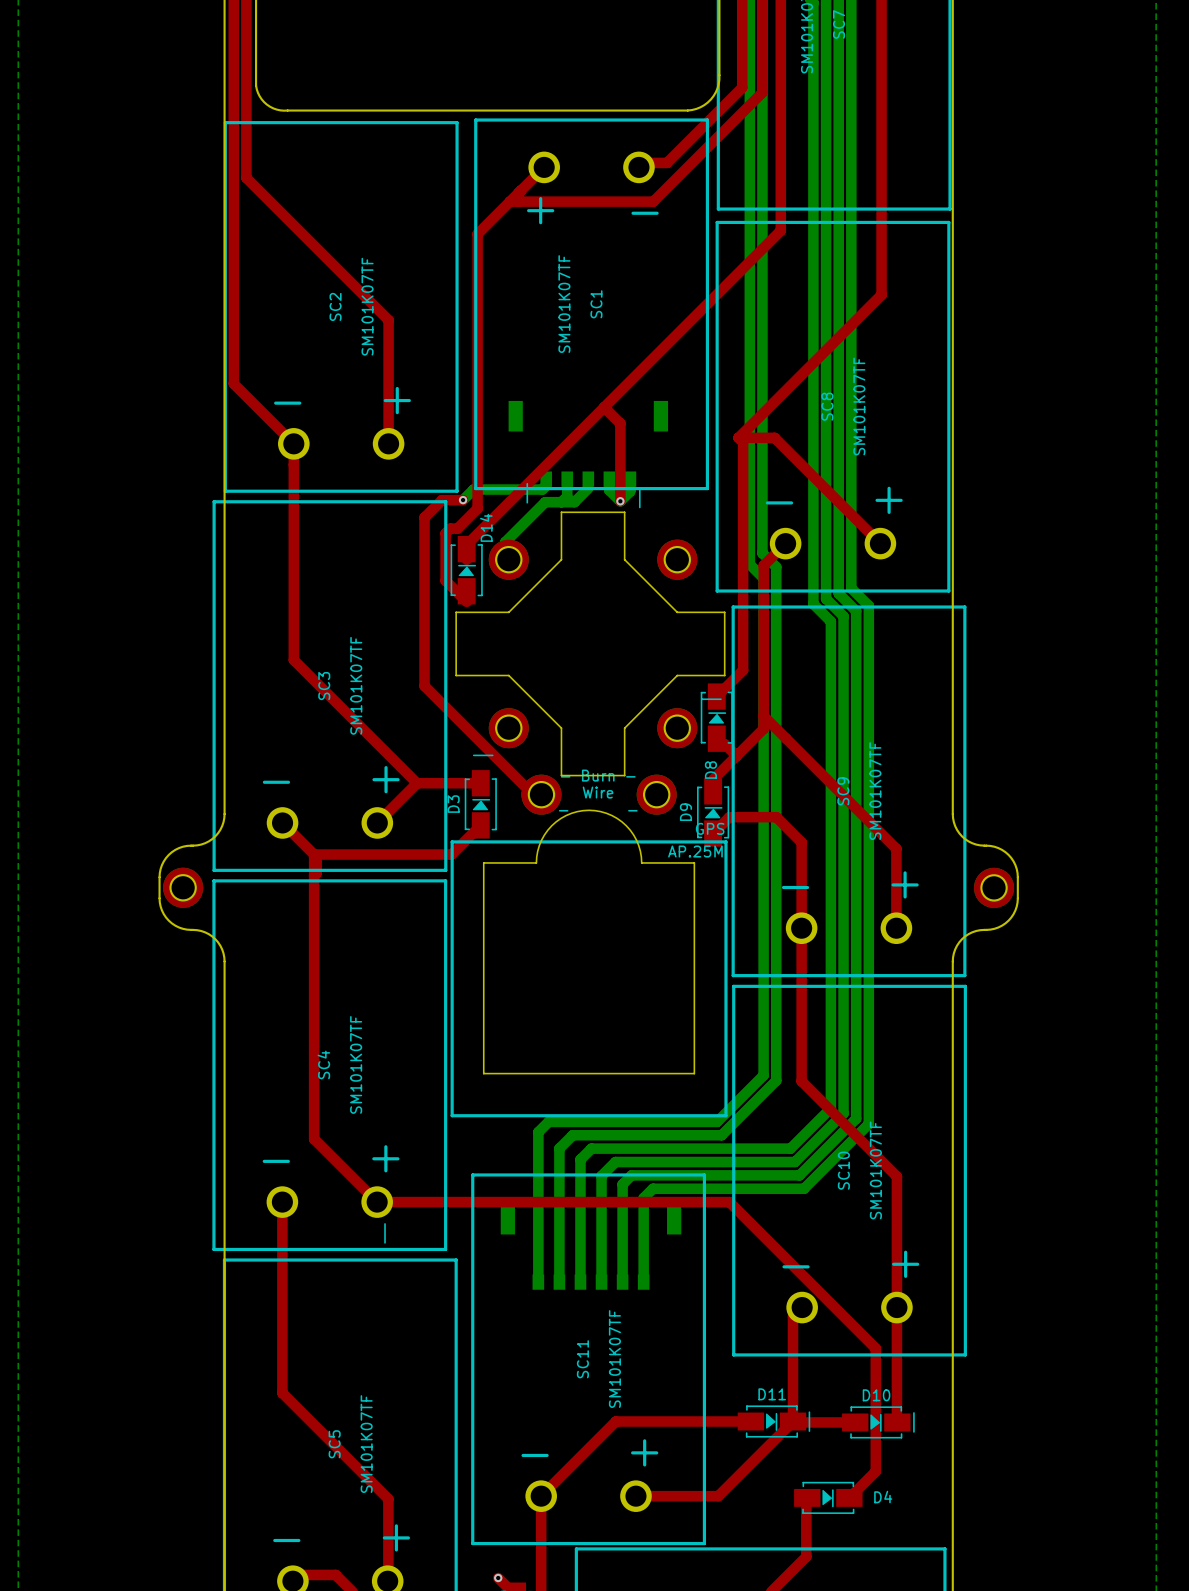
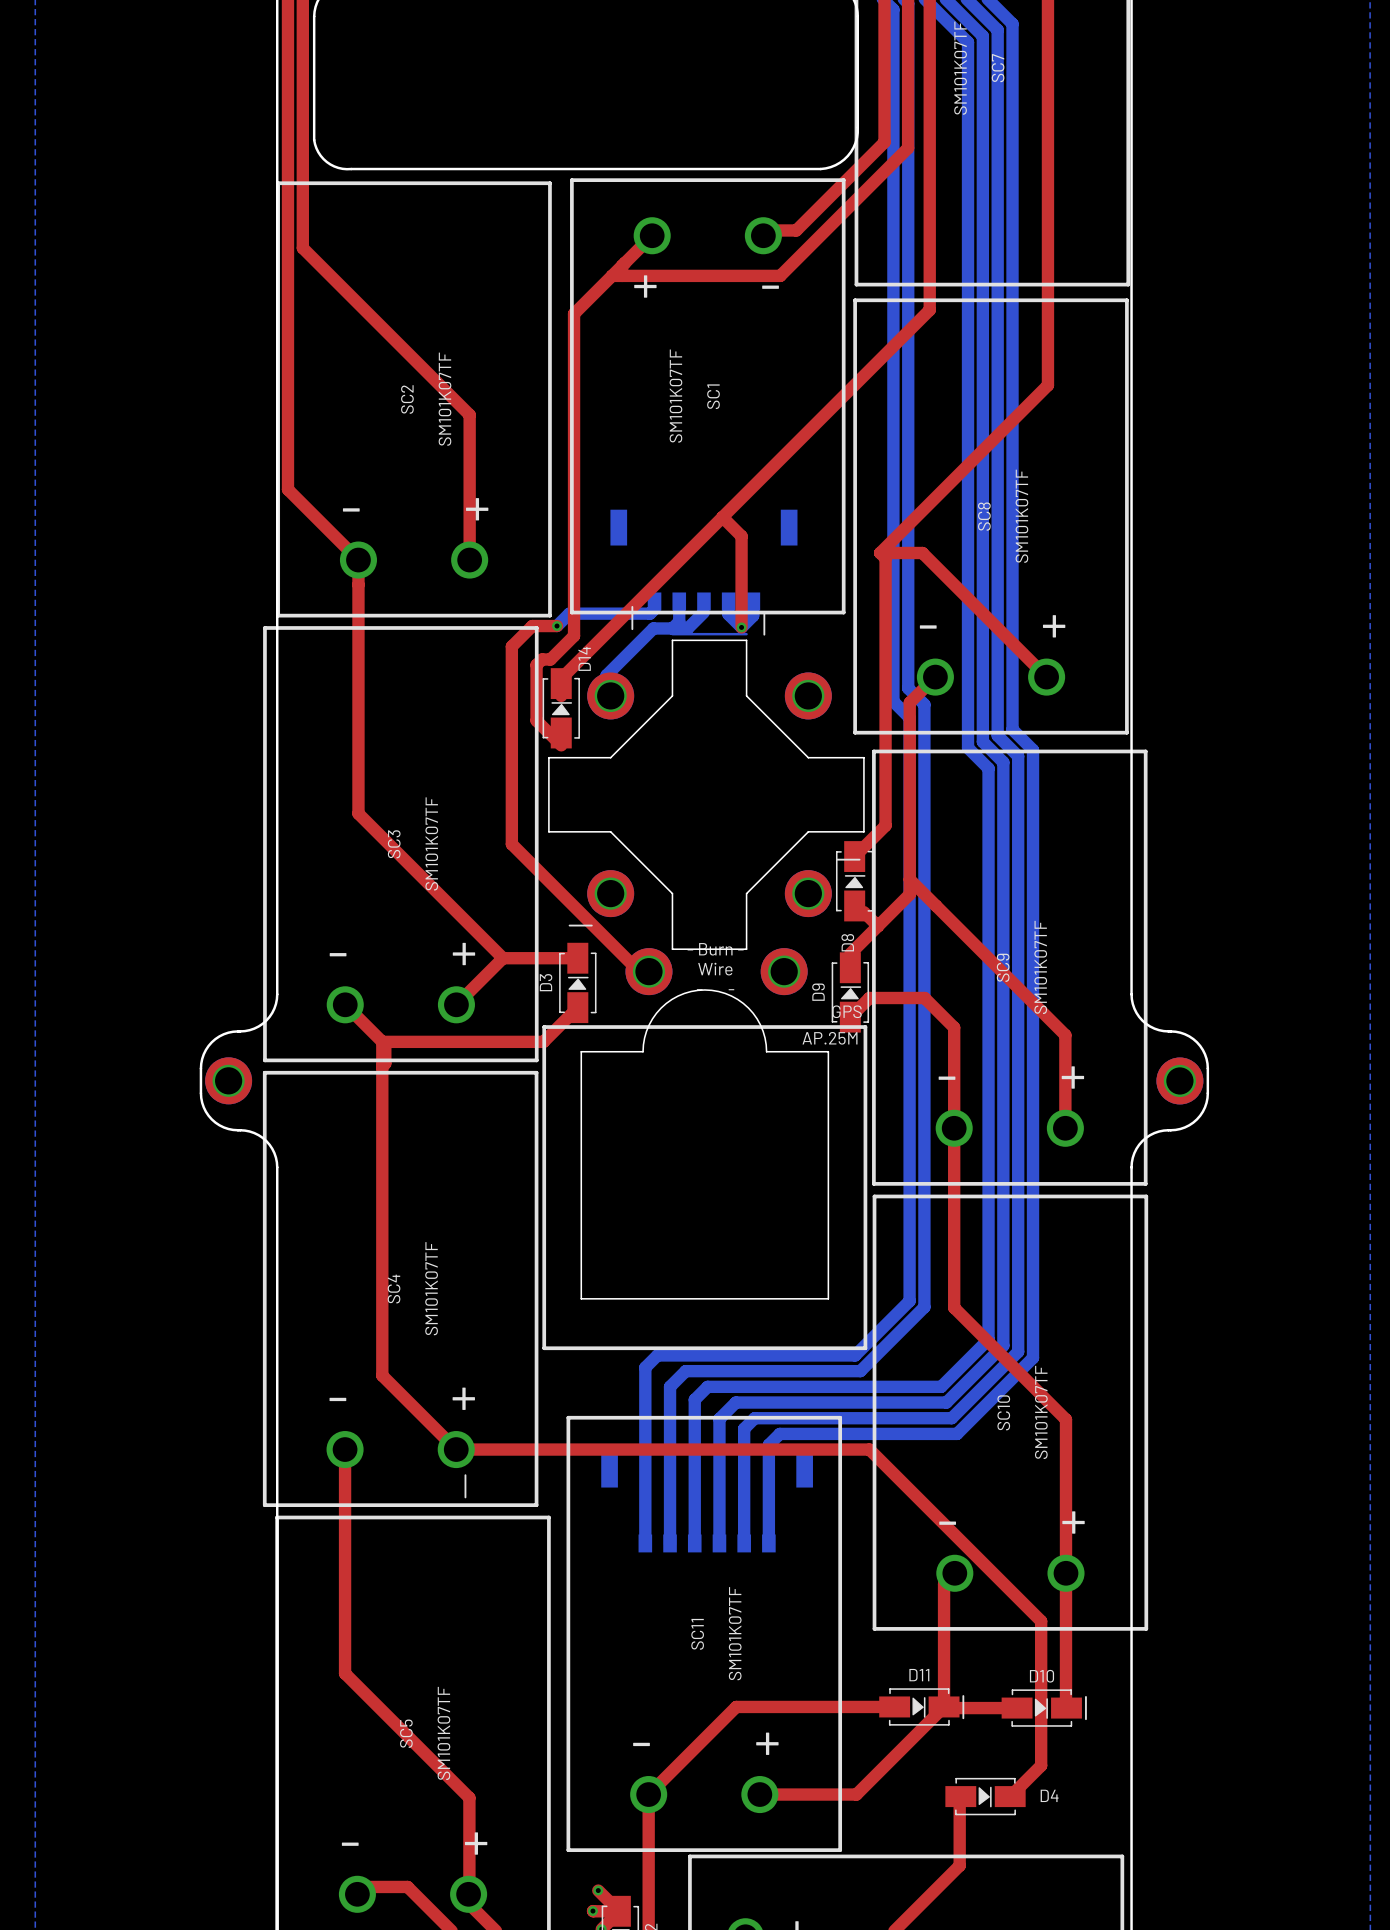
bottom track: none -> (672, 634) (746, 634)

